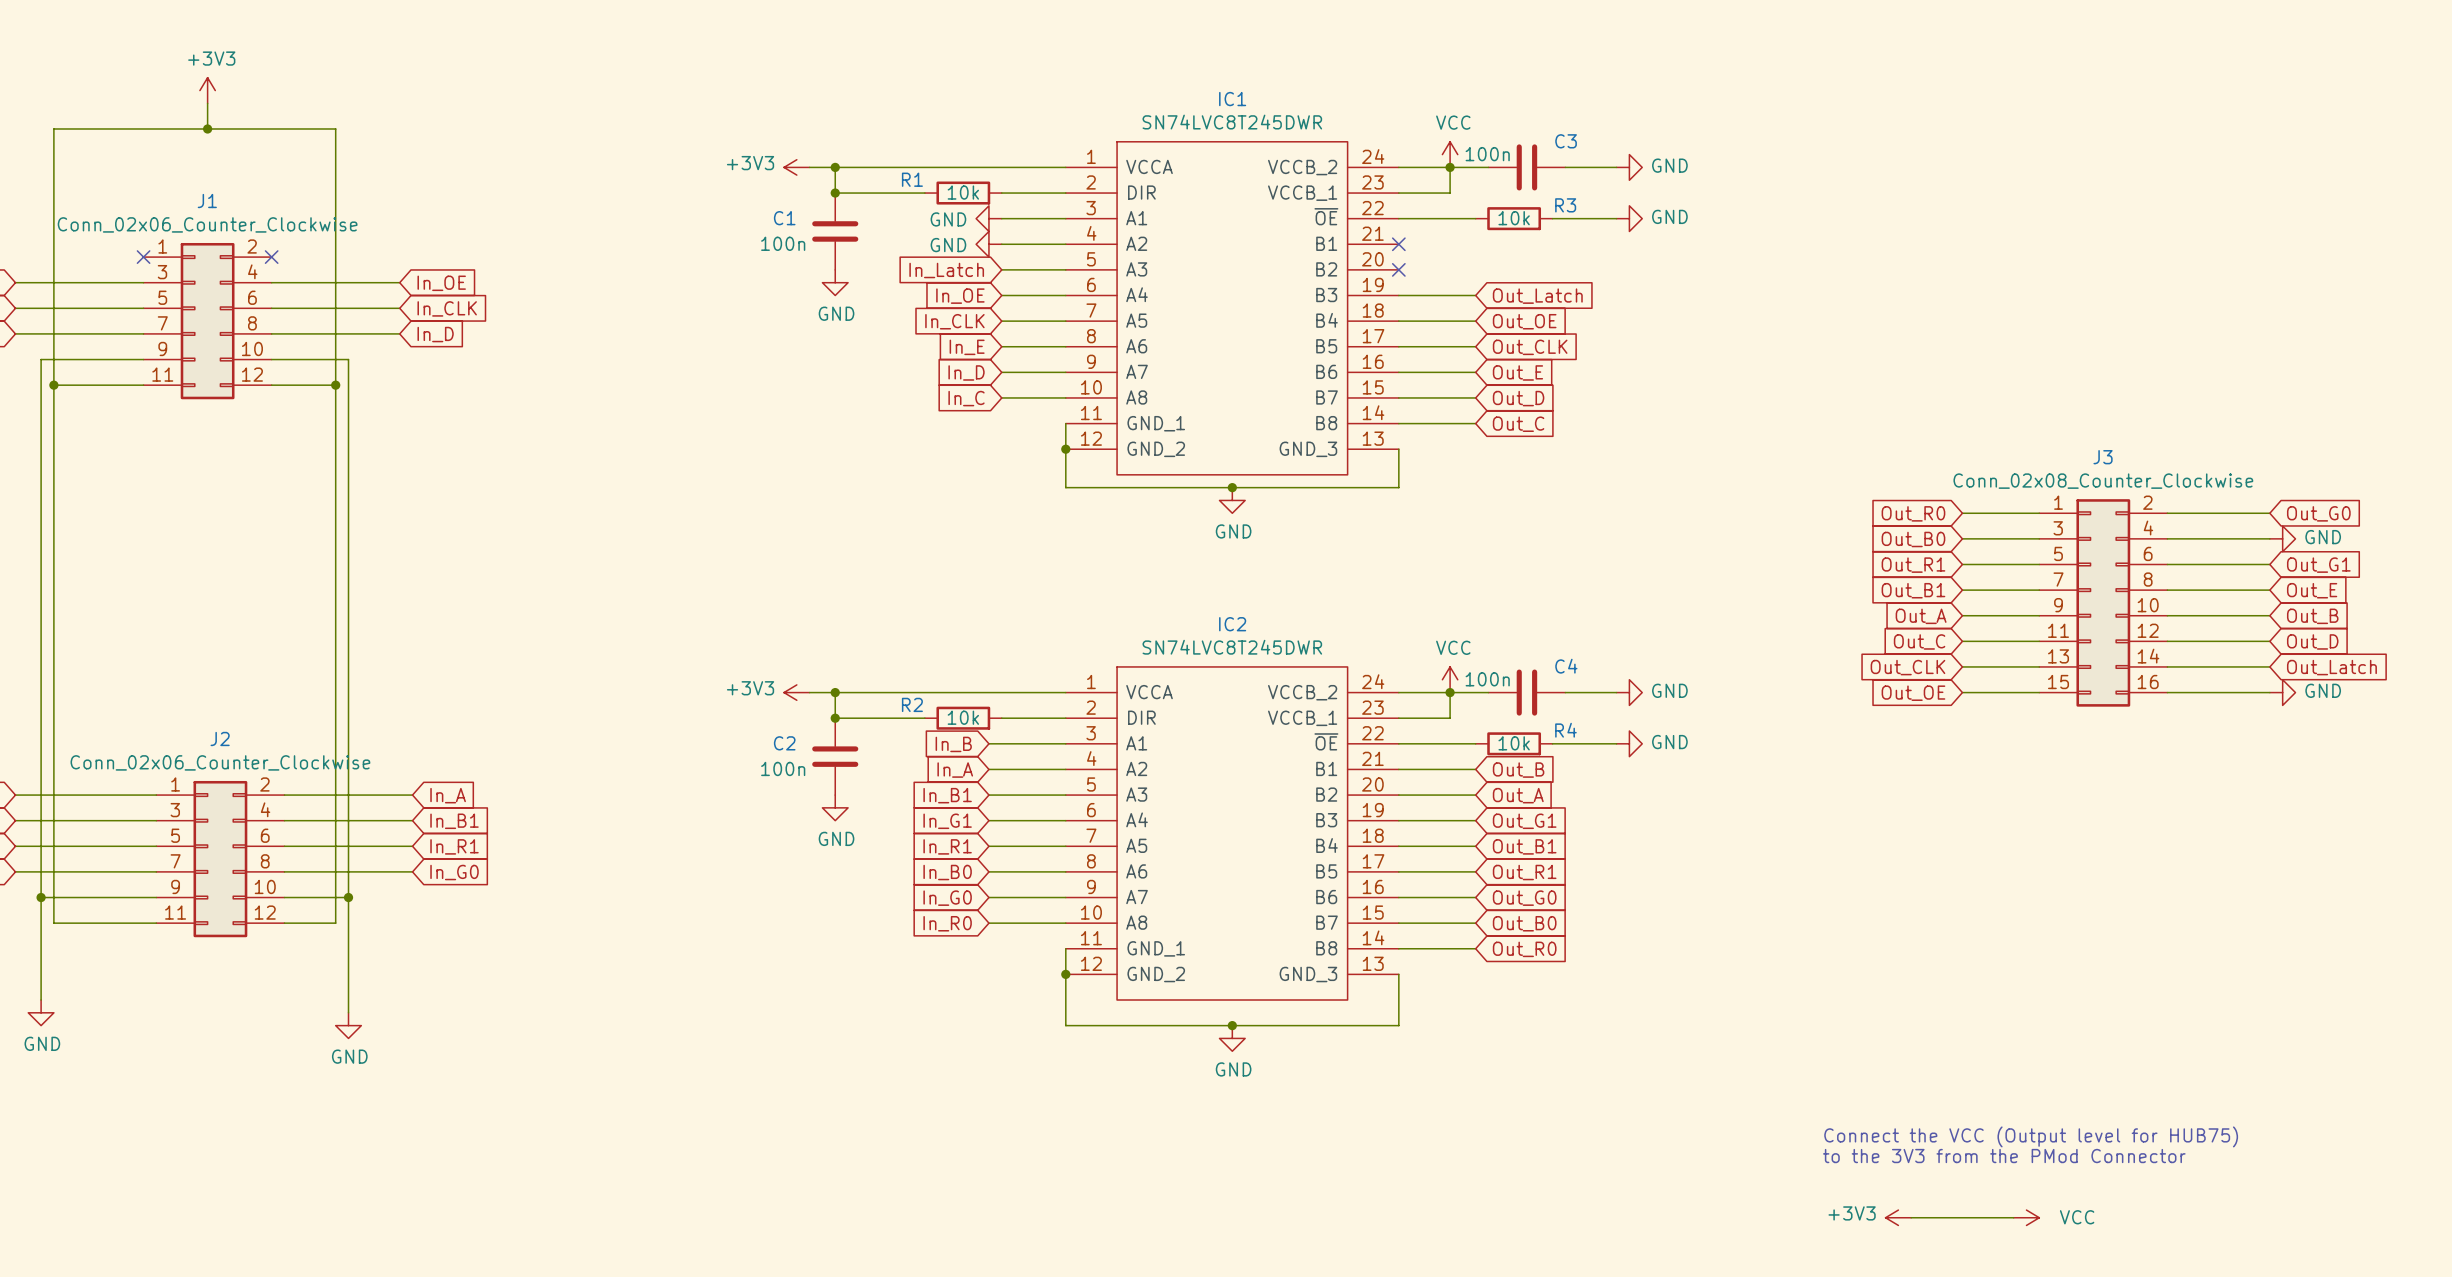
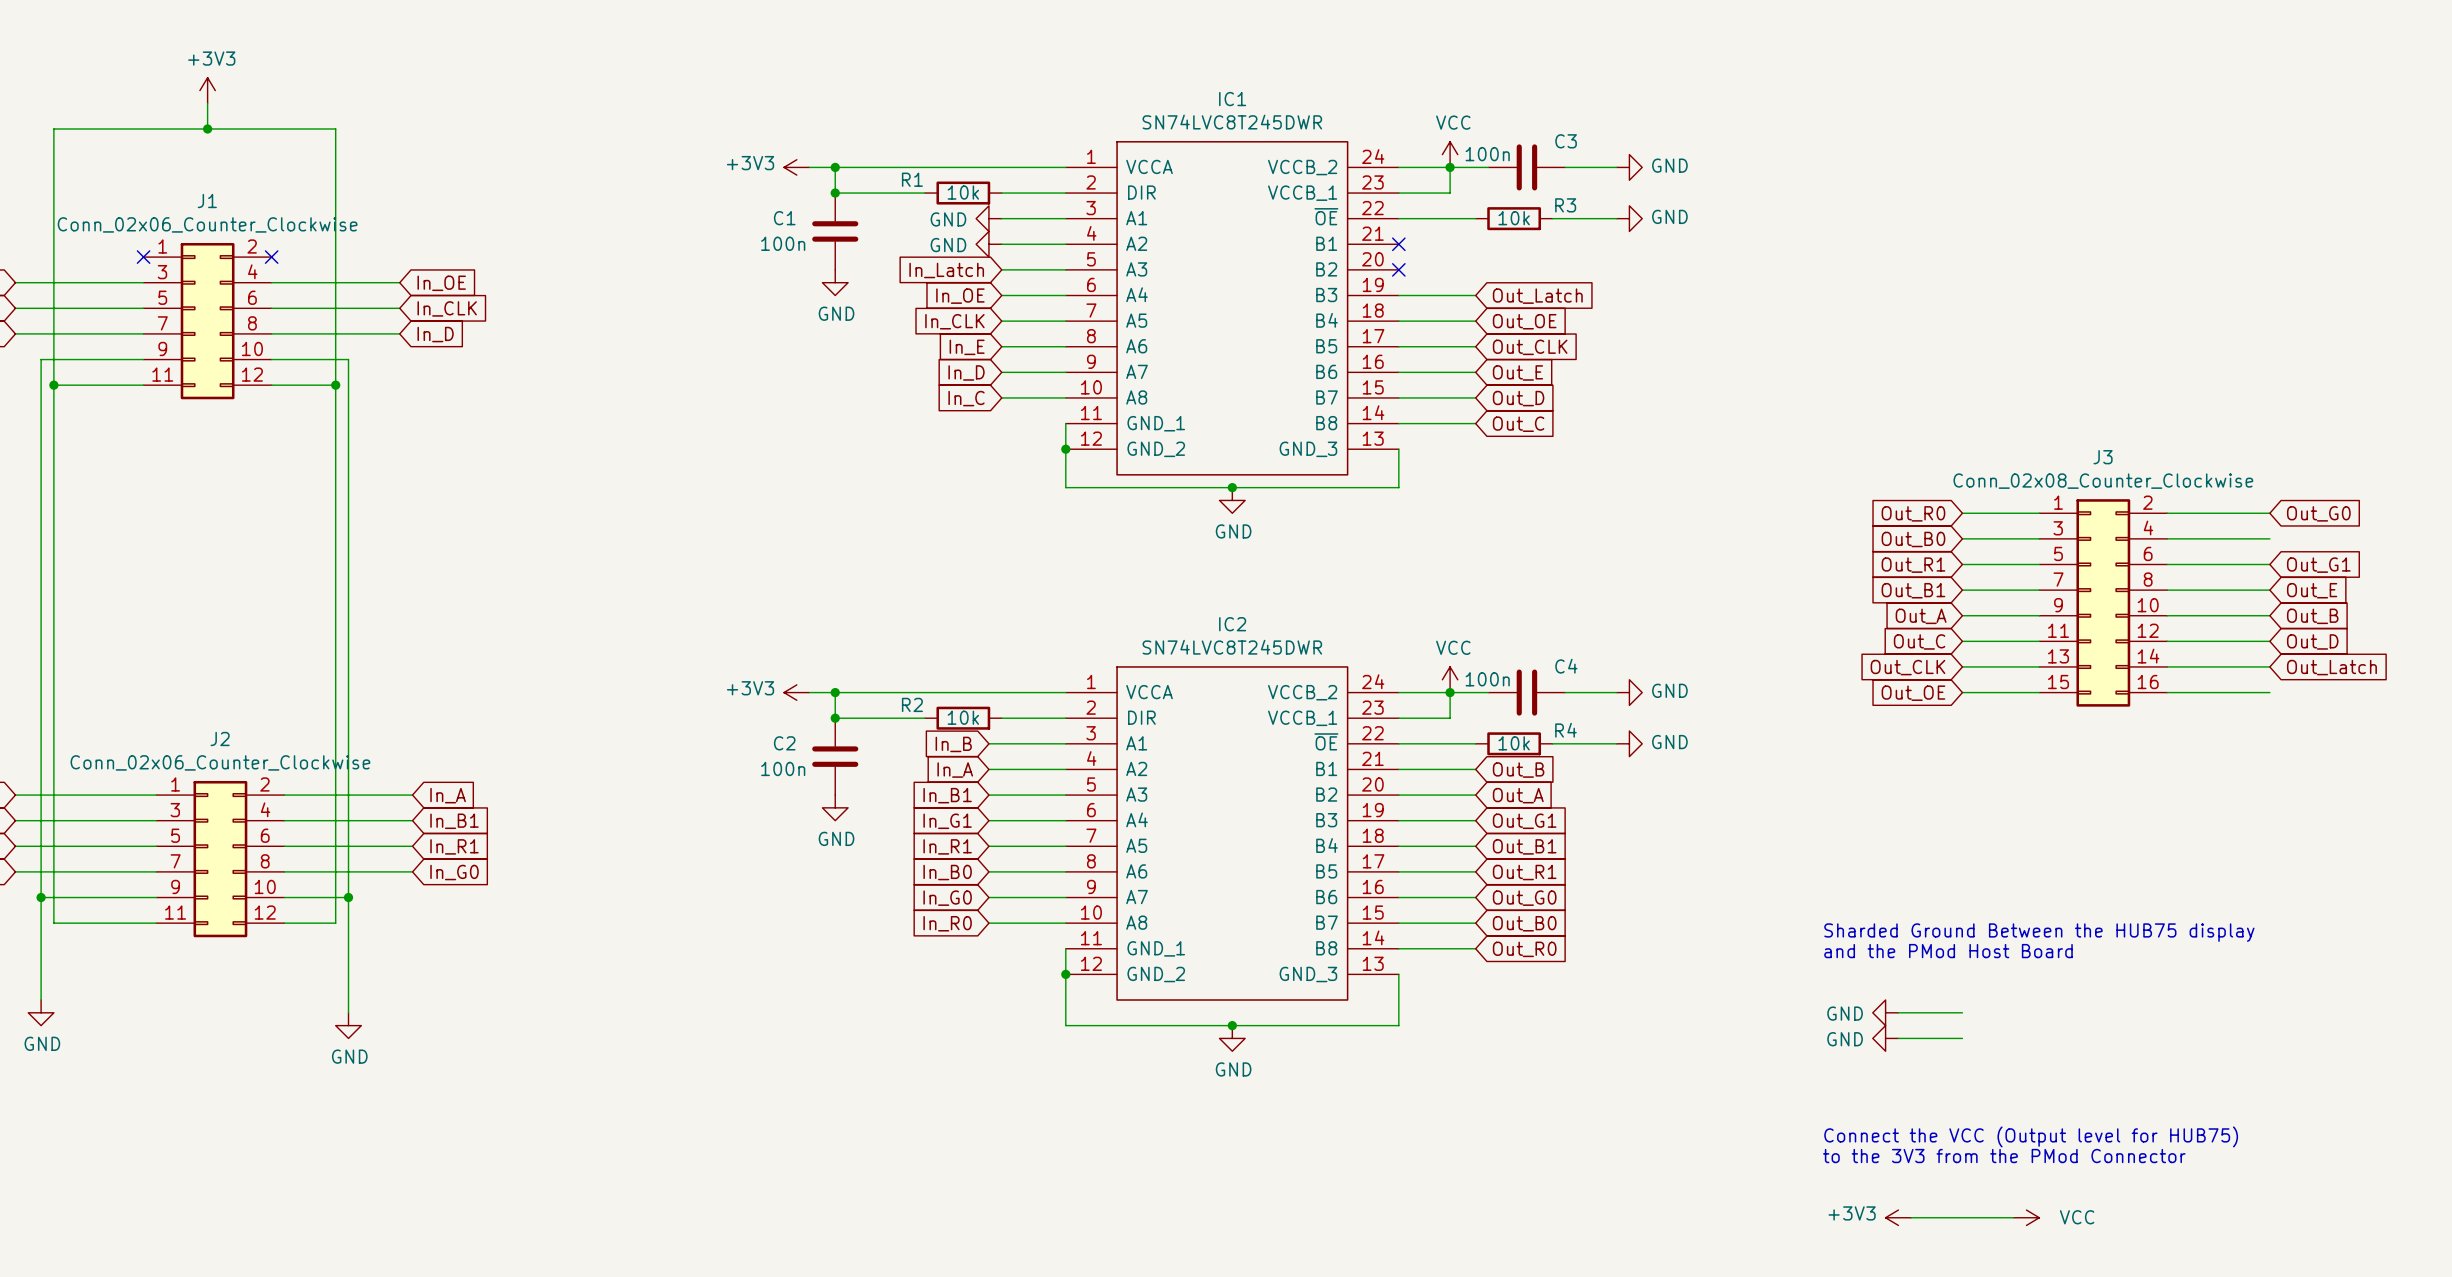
power symbol: GND (2282, 538) -> none
power symbol: GND (2282, 692) -> none
text: none -> Sharded Ground Between the HUB75 display (2039, 932)
text: none -> and the PMod Host Board (1948, 951)
power symbol: none -> GND (1885, 1012)
wire: none -> (1898, 1012) (1962, 1012)
power symbol: none -> GND (1885, 1038)
wire: none -> (1898, 1038) (1962, 1038)

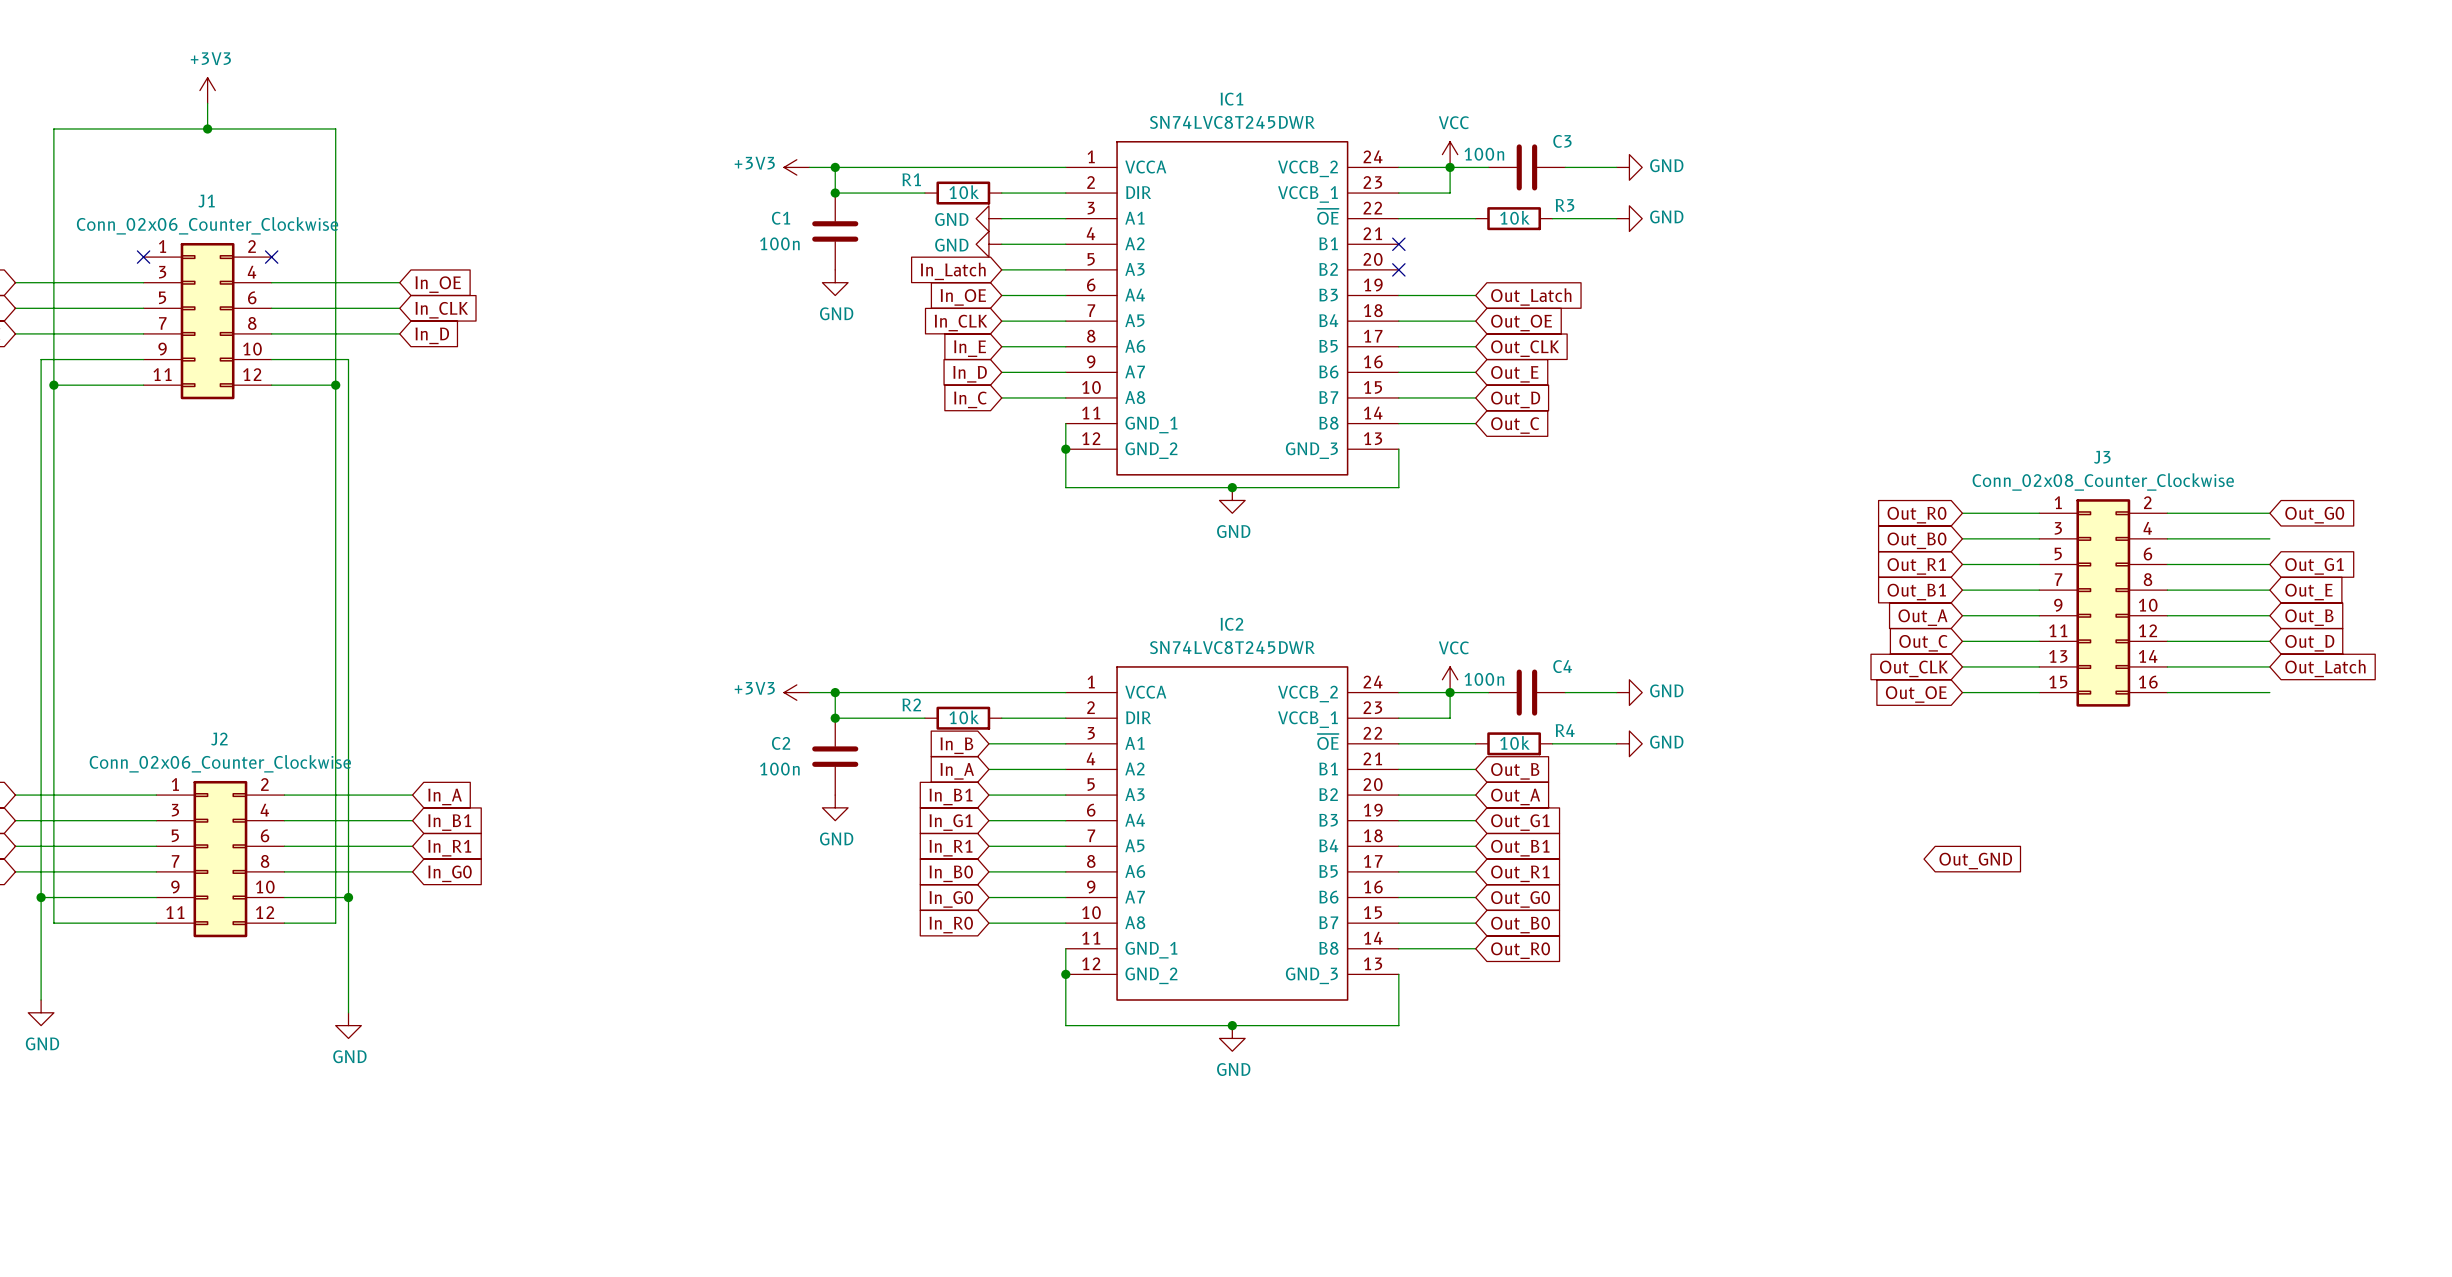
global label: none -> Out_GND (1975, 861)
text: Sharded Ground Between the HUB75 display (2039, 932) -> none
text: and the PMod Host Board (1948, 951) -> none
power symbol: GND (1885, 1012) -> none
wire: (1898, 1012) (1962, 1012) -> none
power symbol: GND (1885, 1038) -> none
wire: (1898, 1038) (1962, 1038) -> none
text: Connect the VCC (Output level for HUB75) (2031, 1136) -> none
text: to the 3V3 from the PMod Connector (2004, 1156) -> none
power symbol: +3V3 (1898, 1217) -> none
wire: (1911, 1217) (2013, 1217) -> none
power symbol: VCC (2026, 1217) -> none

